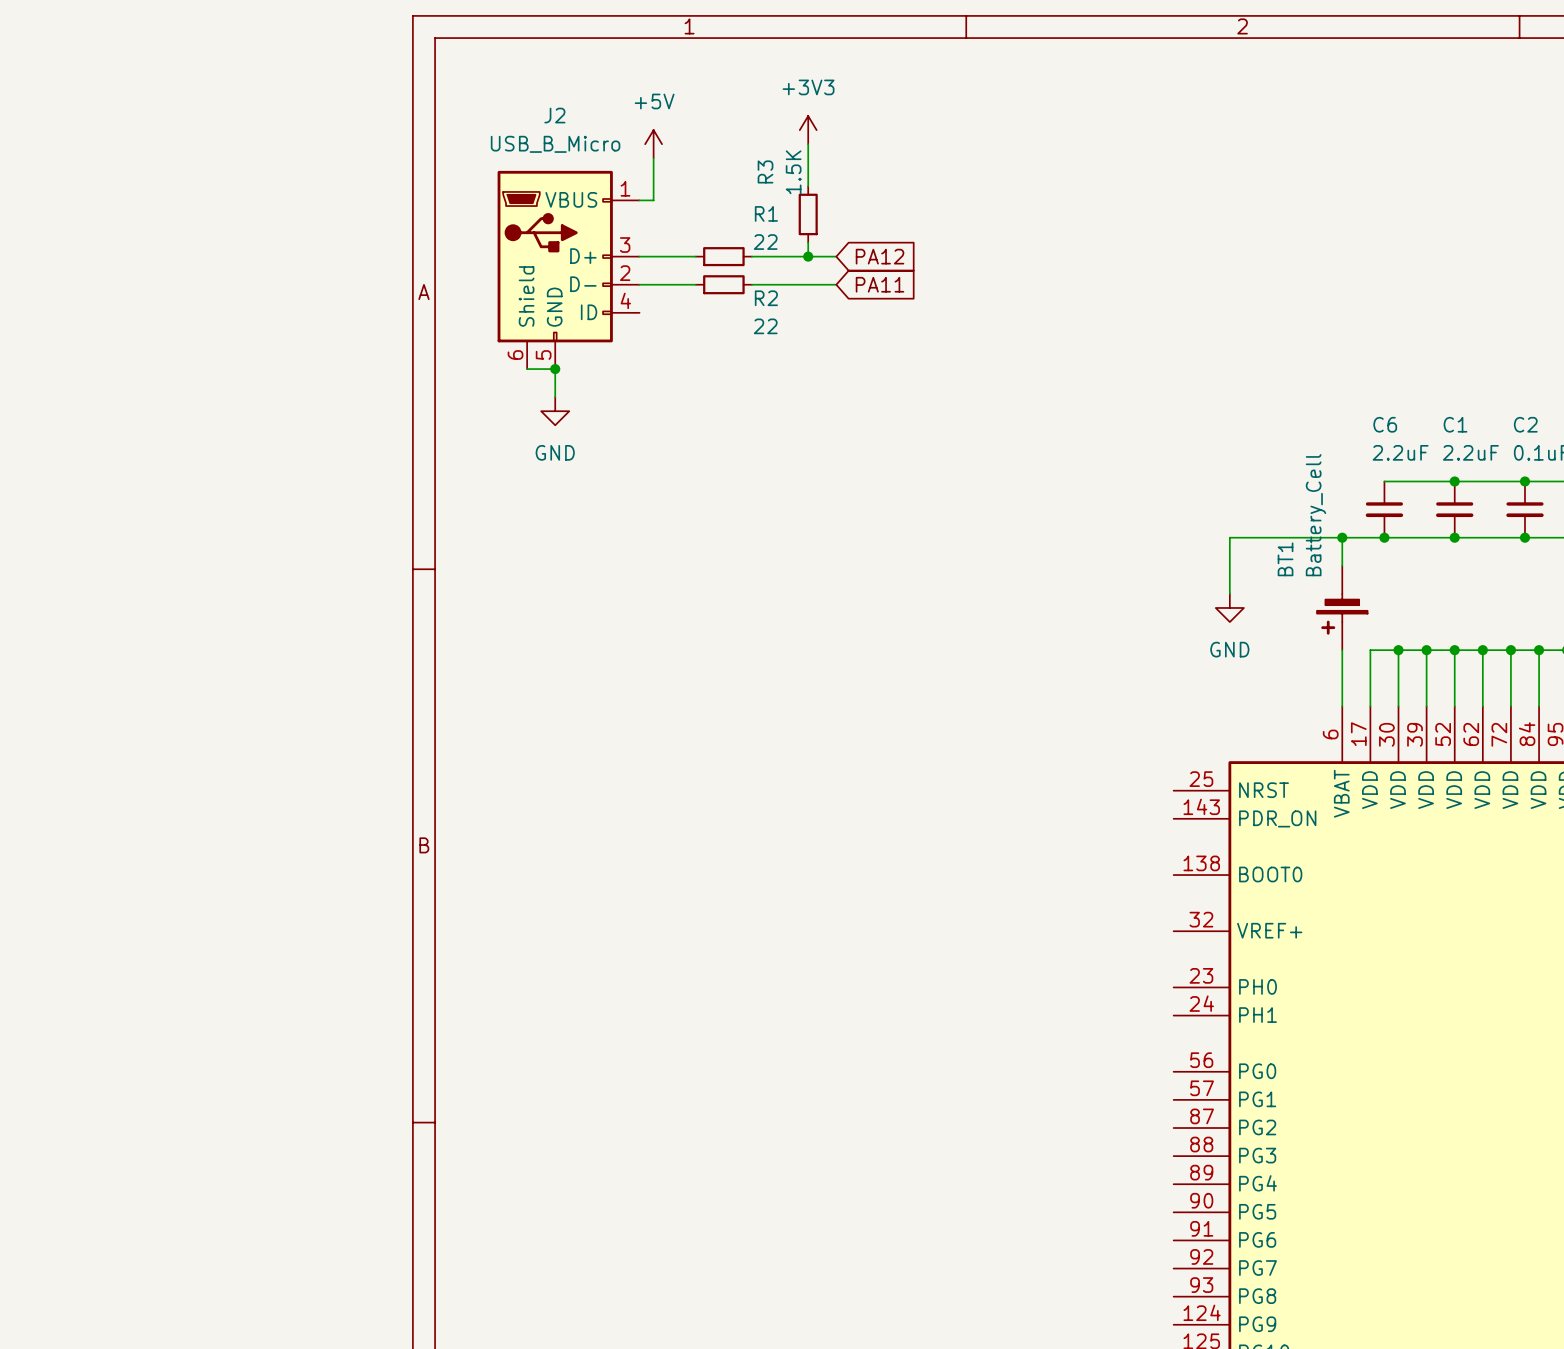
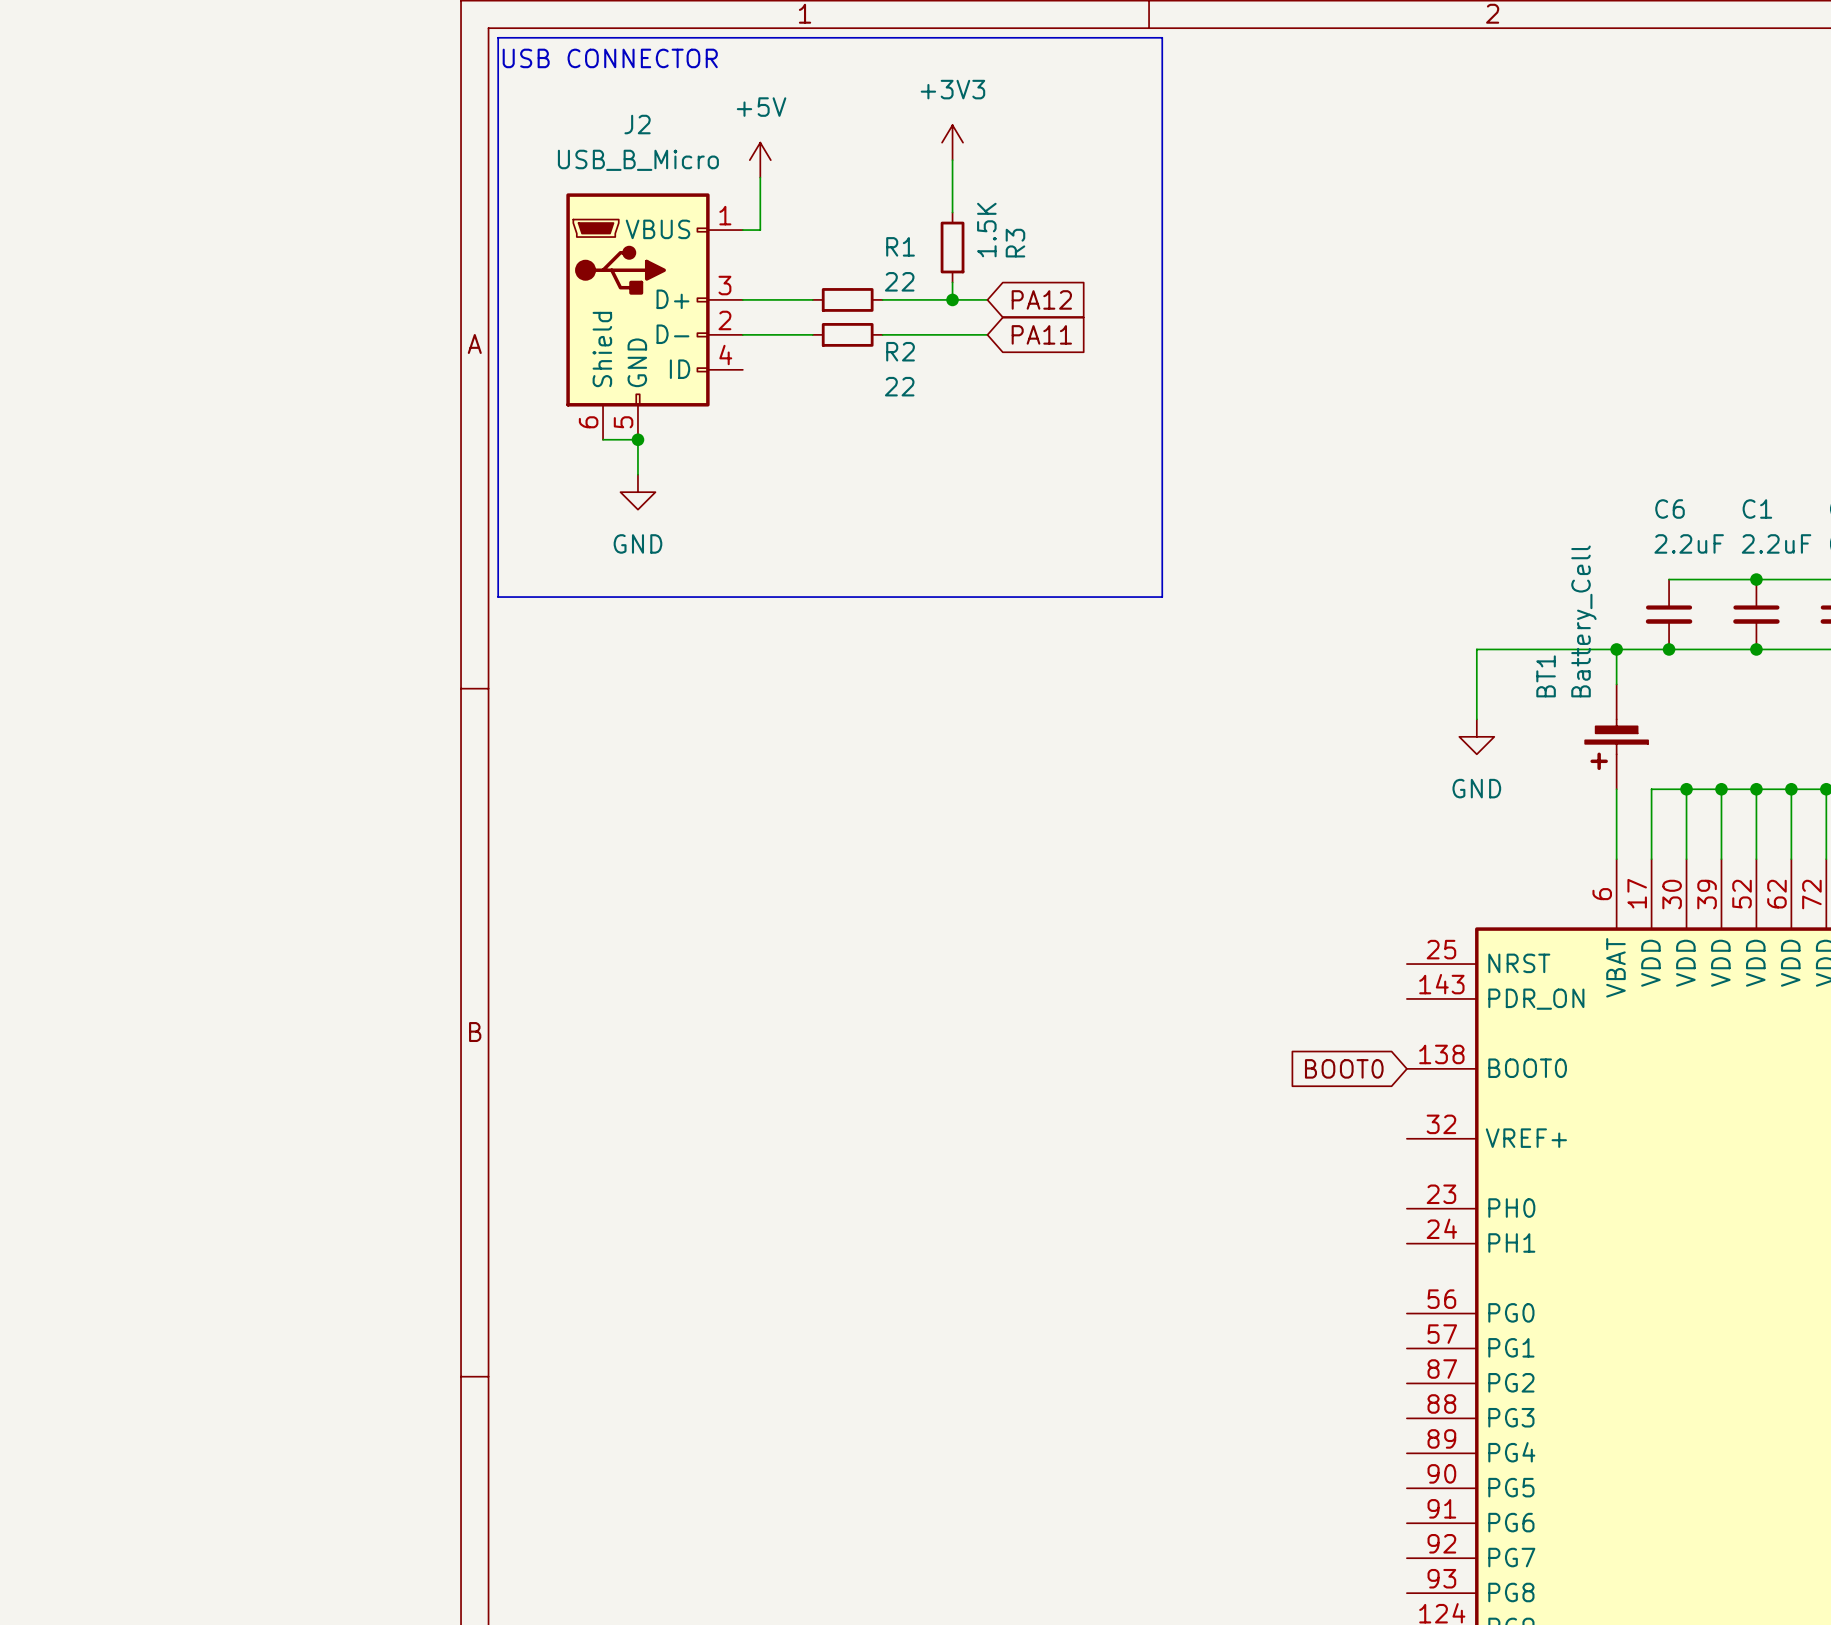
line: none -> (498, 37) (1162, 37) (1162, 597) (498, 597) (498, 37)
text: none -> USB CONNECTOR (610, 58)
R3 name position: R3 (765, 171) -> R3 (1015, 243)
R3 value position: 1.5K (793, 172) -> 1.5K (986, 230)
global label: none -> BOOT0 (1344, 1068)

